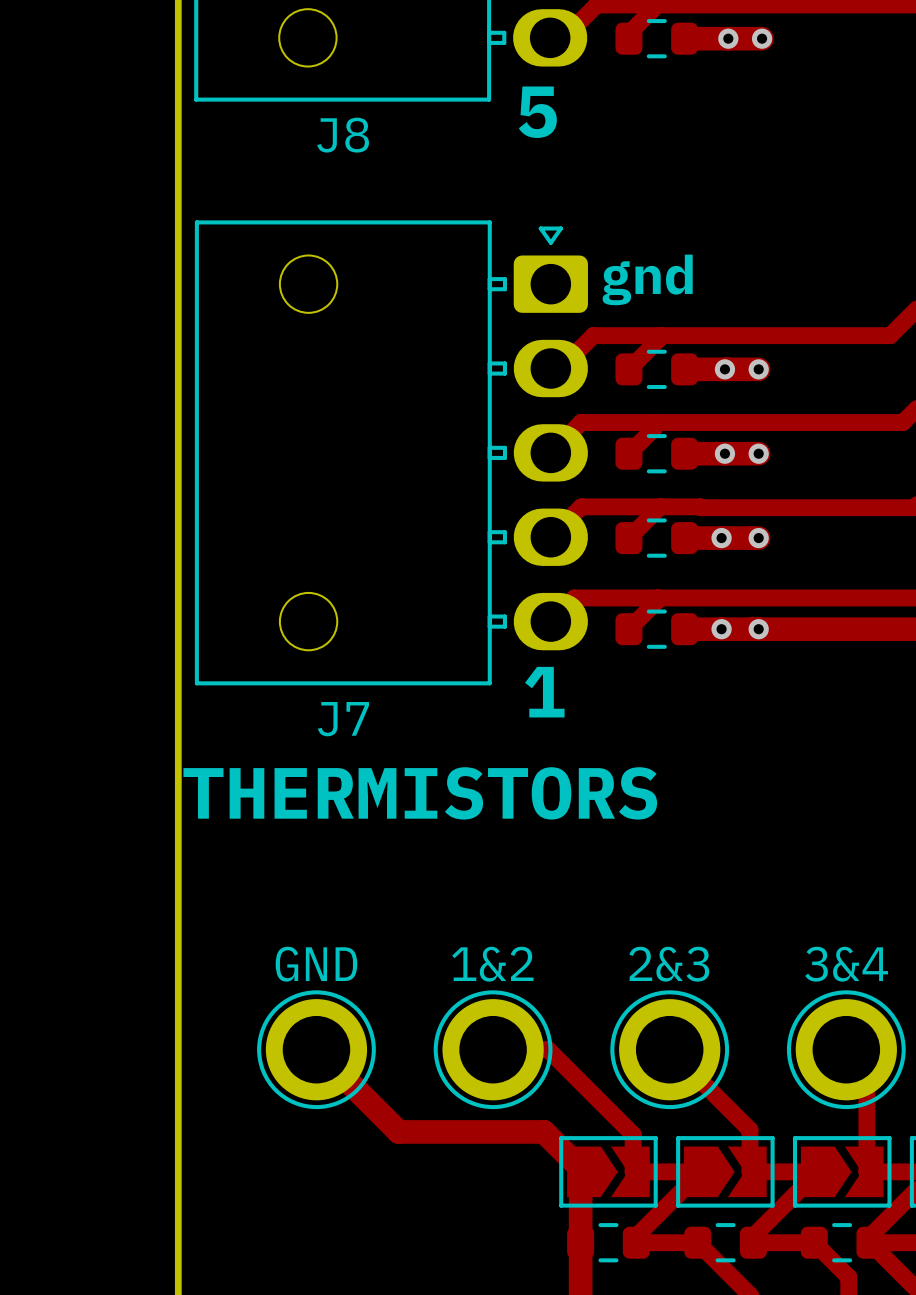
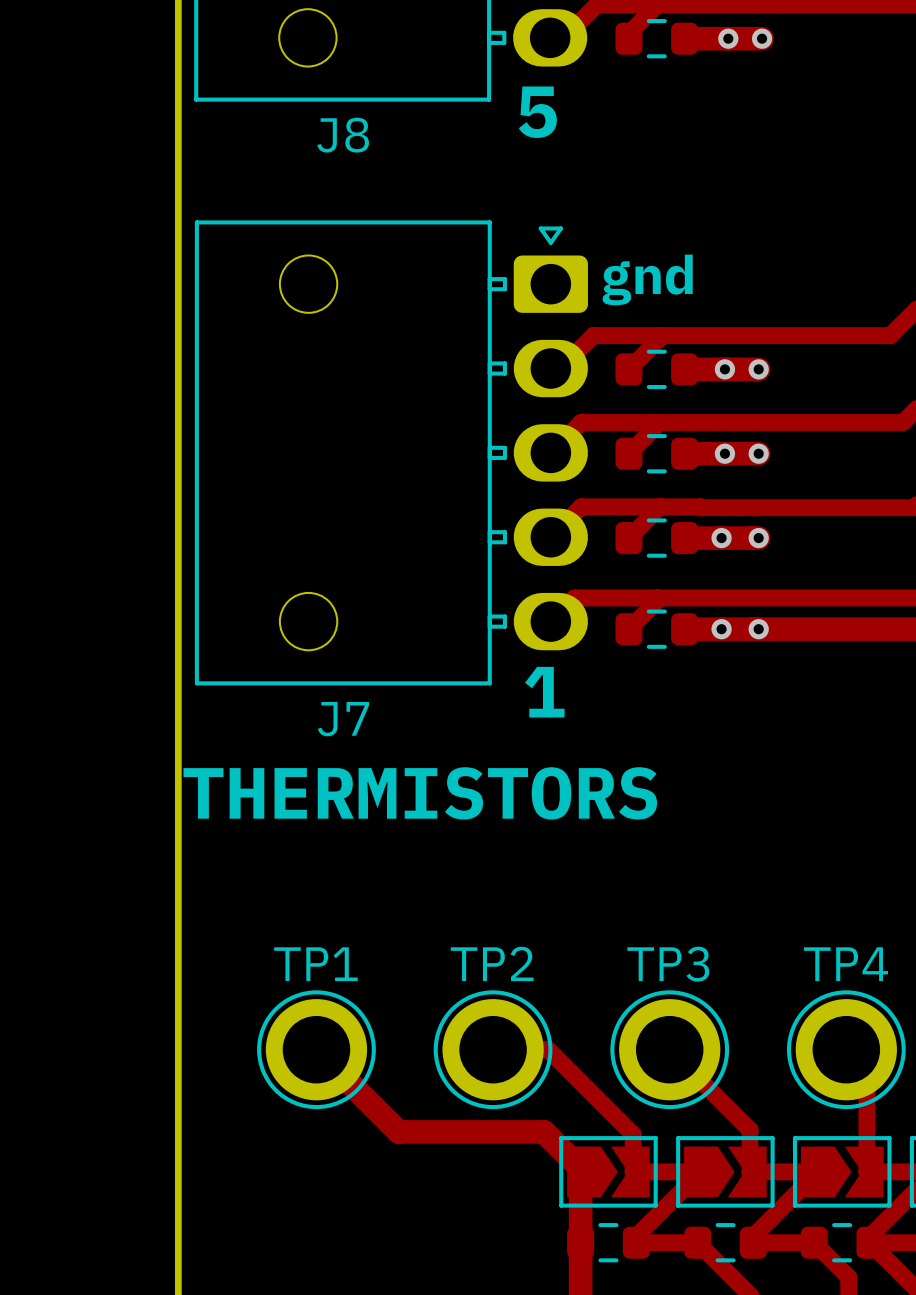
GND name: GND (316, 964) -> TP1 (315, 964)
1&2 name: 1&2 (492, 964) -> TP2 (492, 963)
2&3 name: 2&3 (669, 964) -> TP3 (668, 964)
3&4 name: 3&4 (846, 964) -> TP4 (846, 964)

